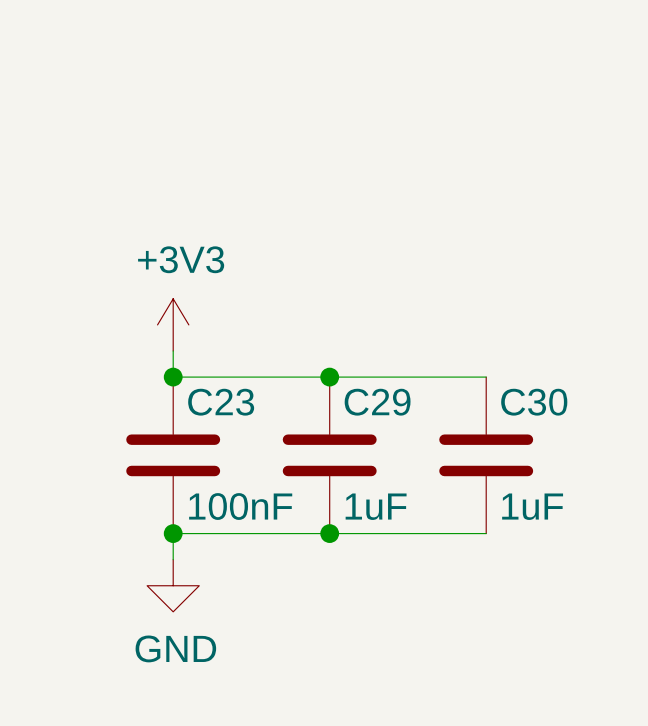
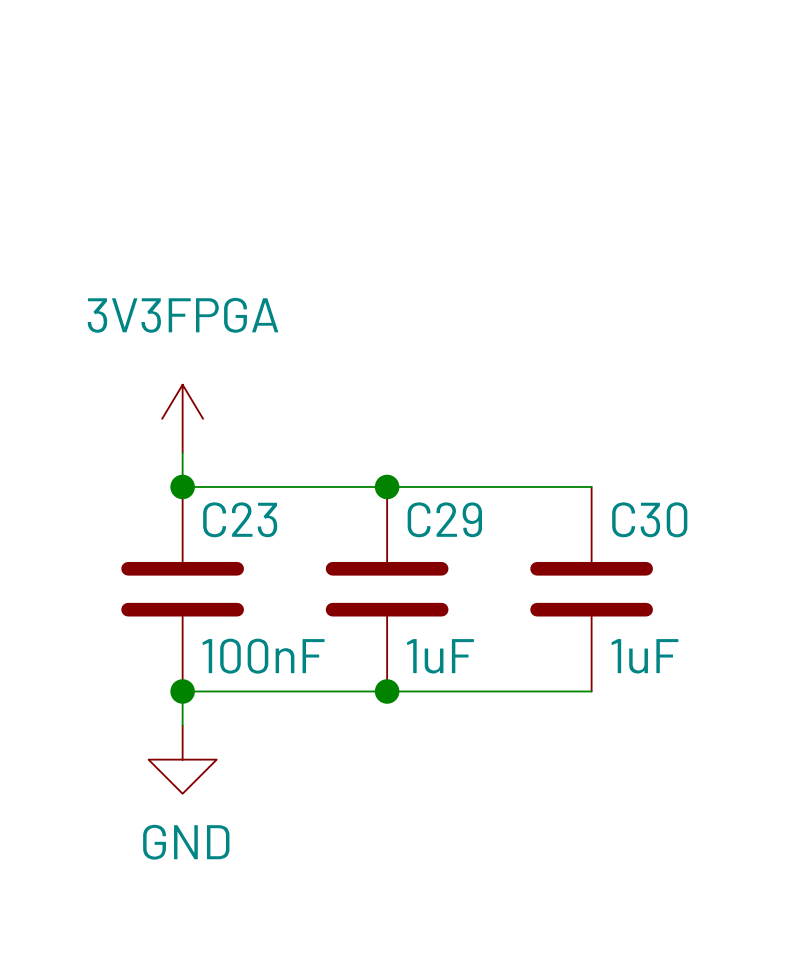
power symbol: +3V3 (173, 324) -> 3V3FPGA (182, 418)

